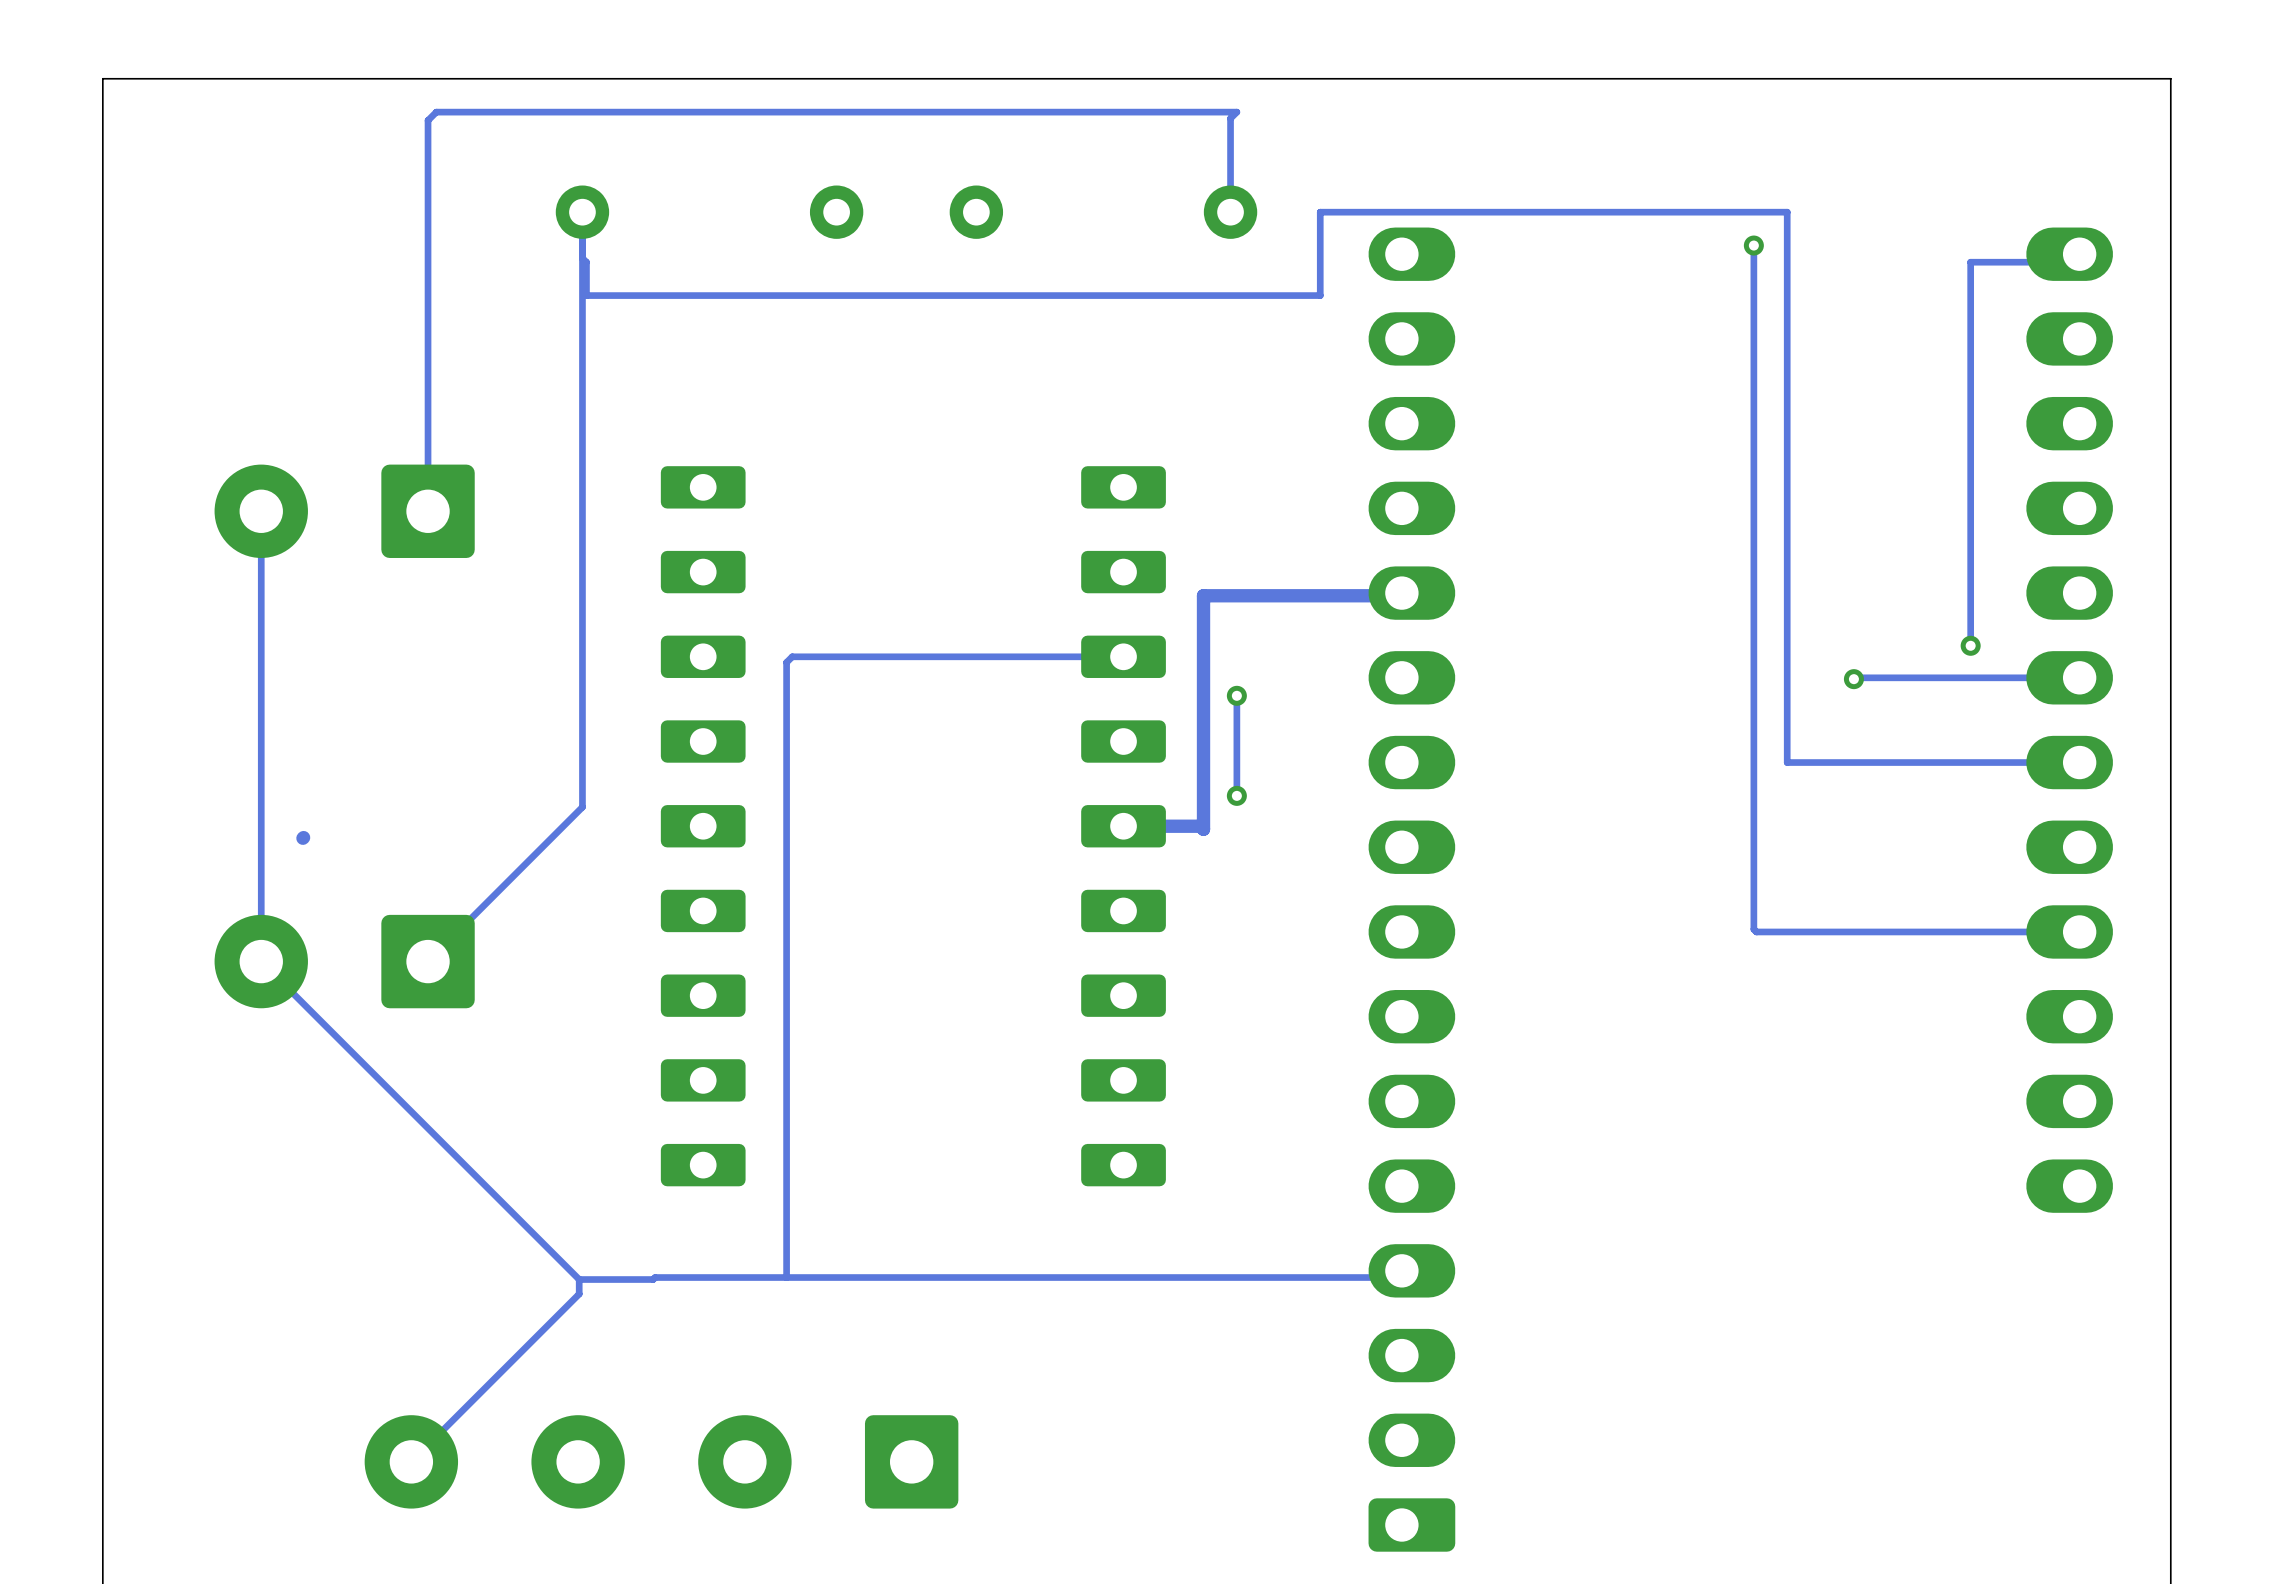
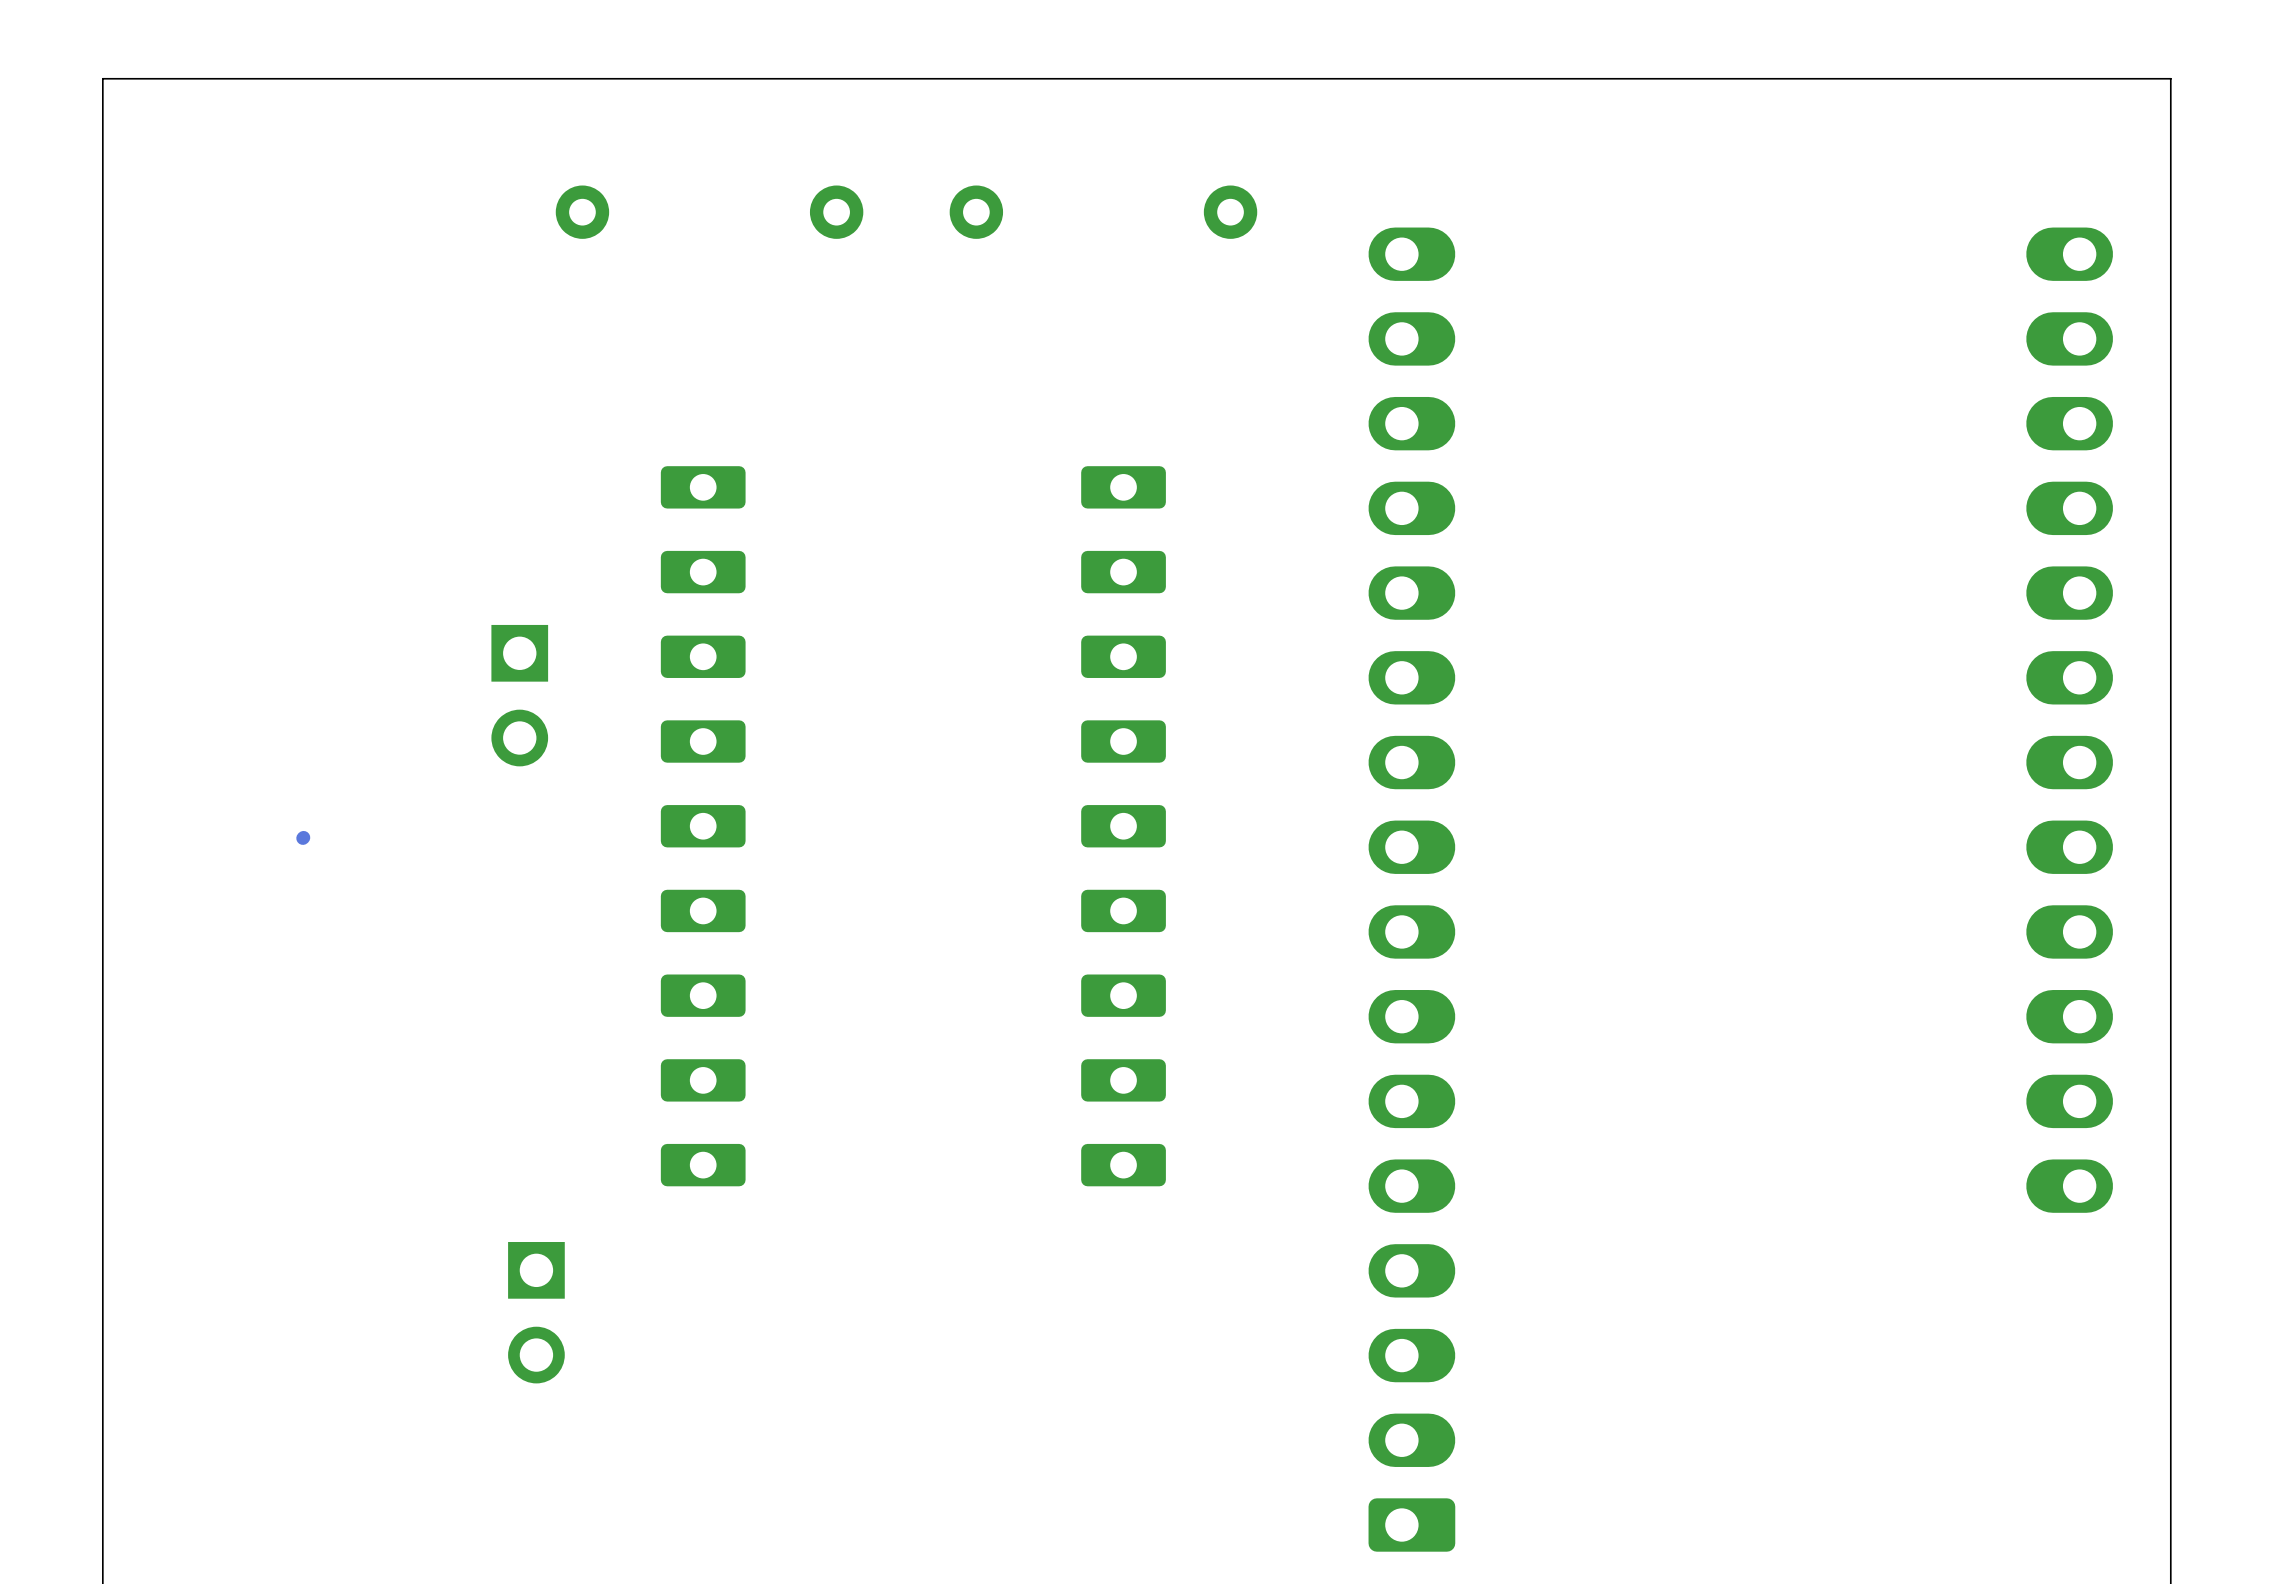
track: (582, 212) (582, 807) (428, 961) -> none
track: (1230, 212) (1230, 118) (1236, 112) (436, 112) (428, 120) (428, 511) -> none
track: (1753, 245) (1753, 929) (1756, 931) (2079, 931) -> none
via: (1753, 245) -> none
track: (2079, 254) (2071, 262) (1970, 262) (1970, 645) -> none
track: (582, 258) (586, 262) (586, 295) (1320, 295) (1320, 212) (1787, 212) (1787, 762) (2079, 762) -> none
track: (261, 511) (261, 961) (579, 1279) -> none
part: (344, 511) -> none
track: (1401, 599) (1397, 595) (1203, 595) (1203, 829) (1200, 826) (1123, 826) -> none
via: (1970, 645) -> none
track: (1123, 656) (792, 656) (786, 662) (786, 1277) -> none
track: (2079, 677) (1853, 679) -> none
via: (1853, 679) -> none
part: none -> (519, 695)
track: (1236, 695) (1236, 795) -> none
via: (1236, 695) -> none
via: (1236, 795) -> none
part: (344, 961) -> none
track: (1401, 1277) (655, 1277) (653, 1279) (579, 1279) -> none
track: (579, 1279) (579, 1294) (411, 1461) -> none
part: none -> (536, 1312)
part: (661, 1461) -> none

